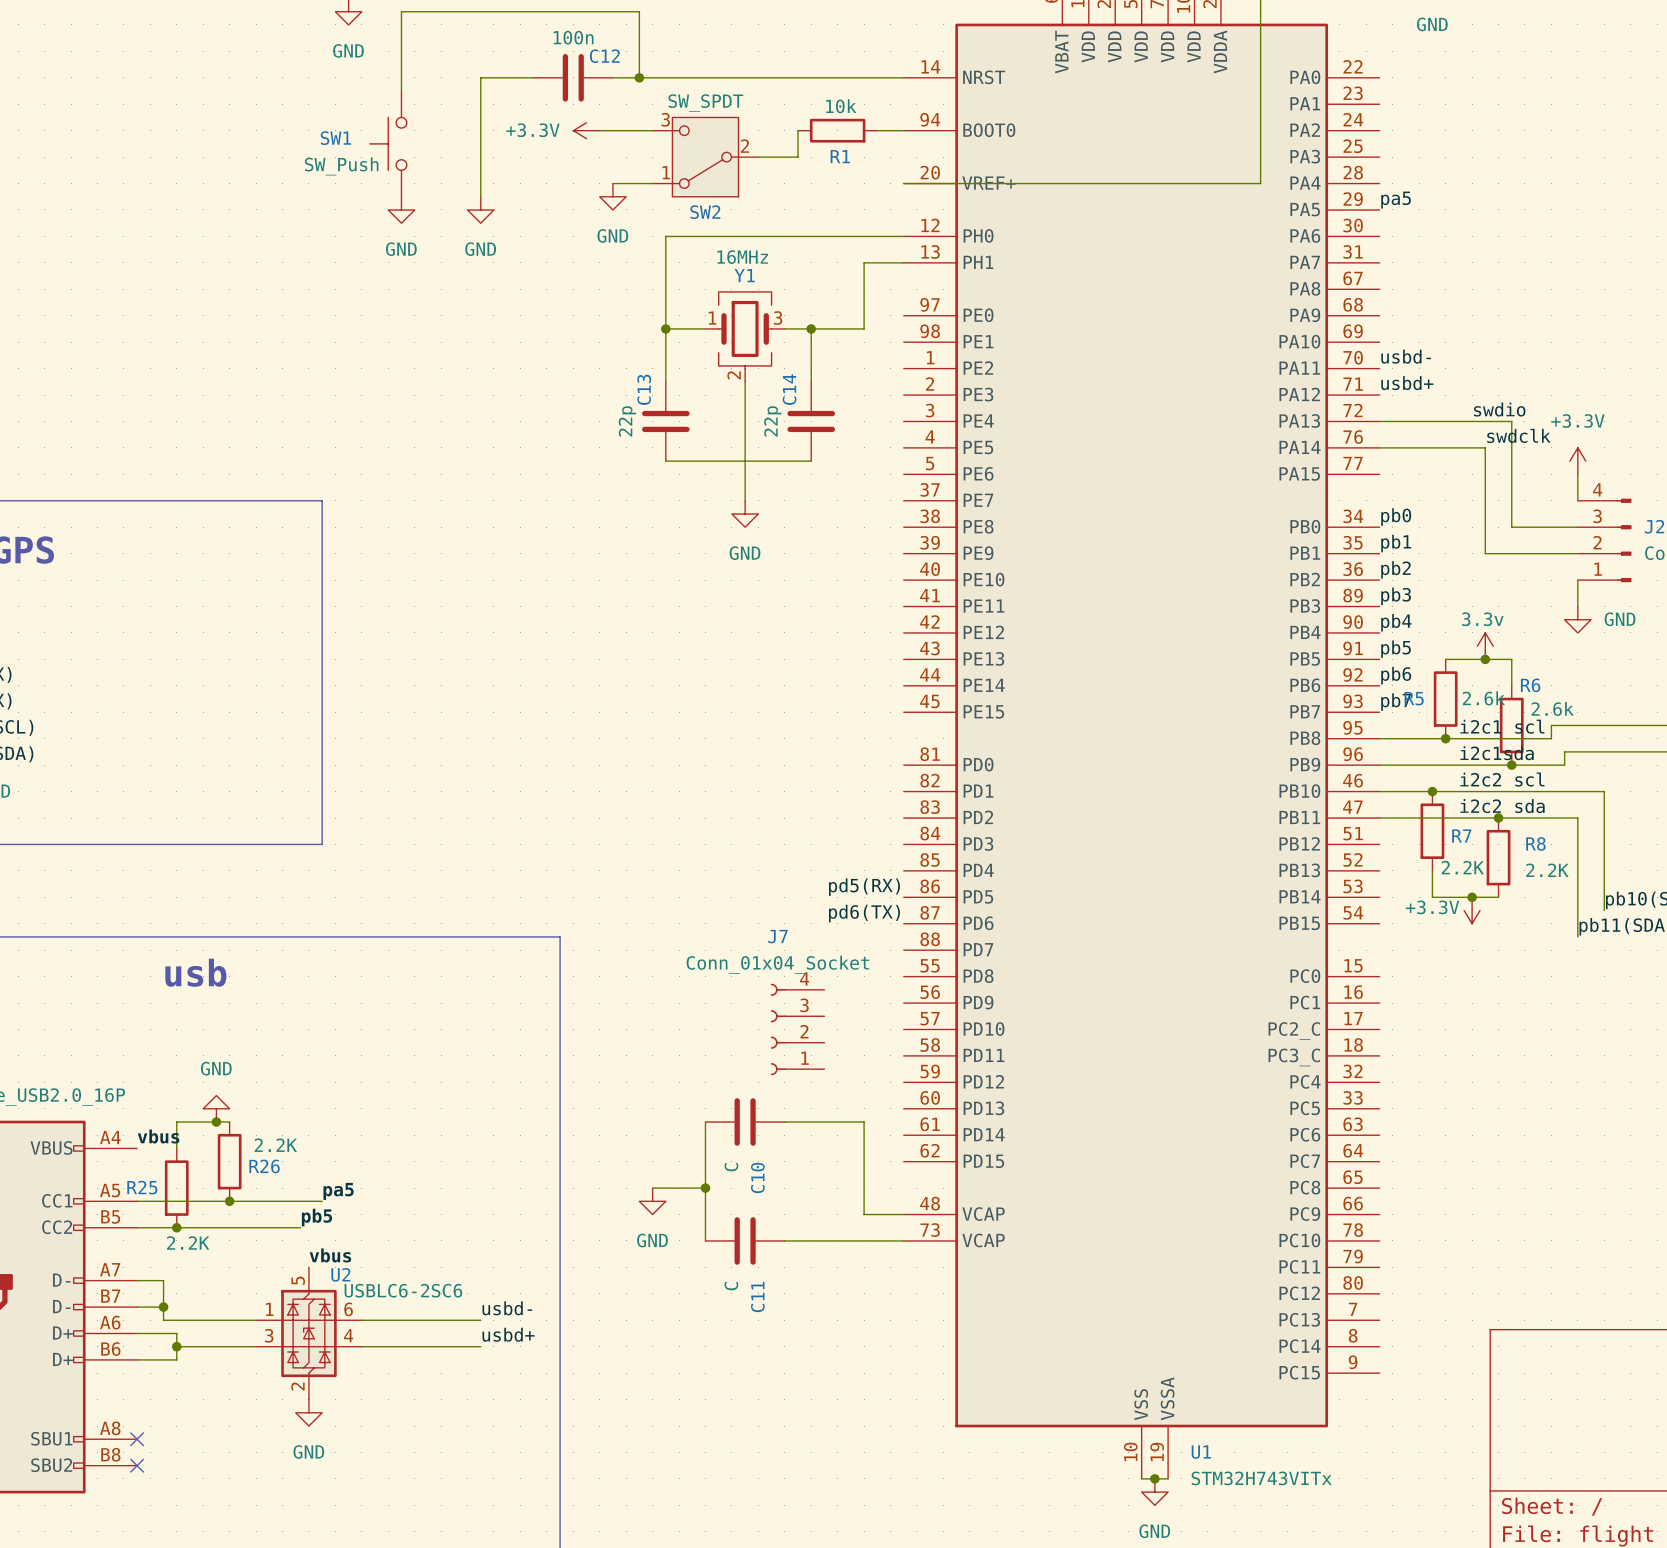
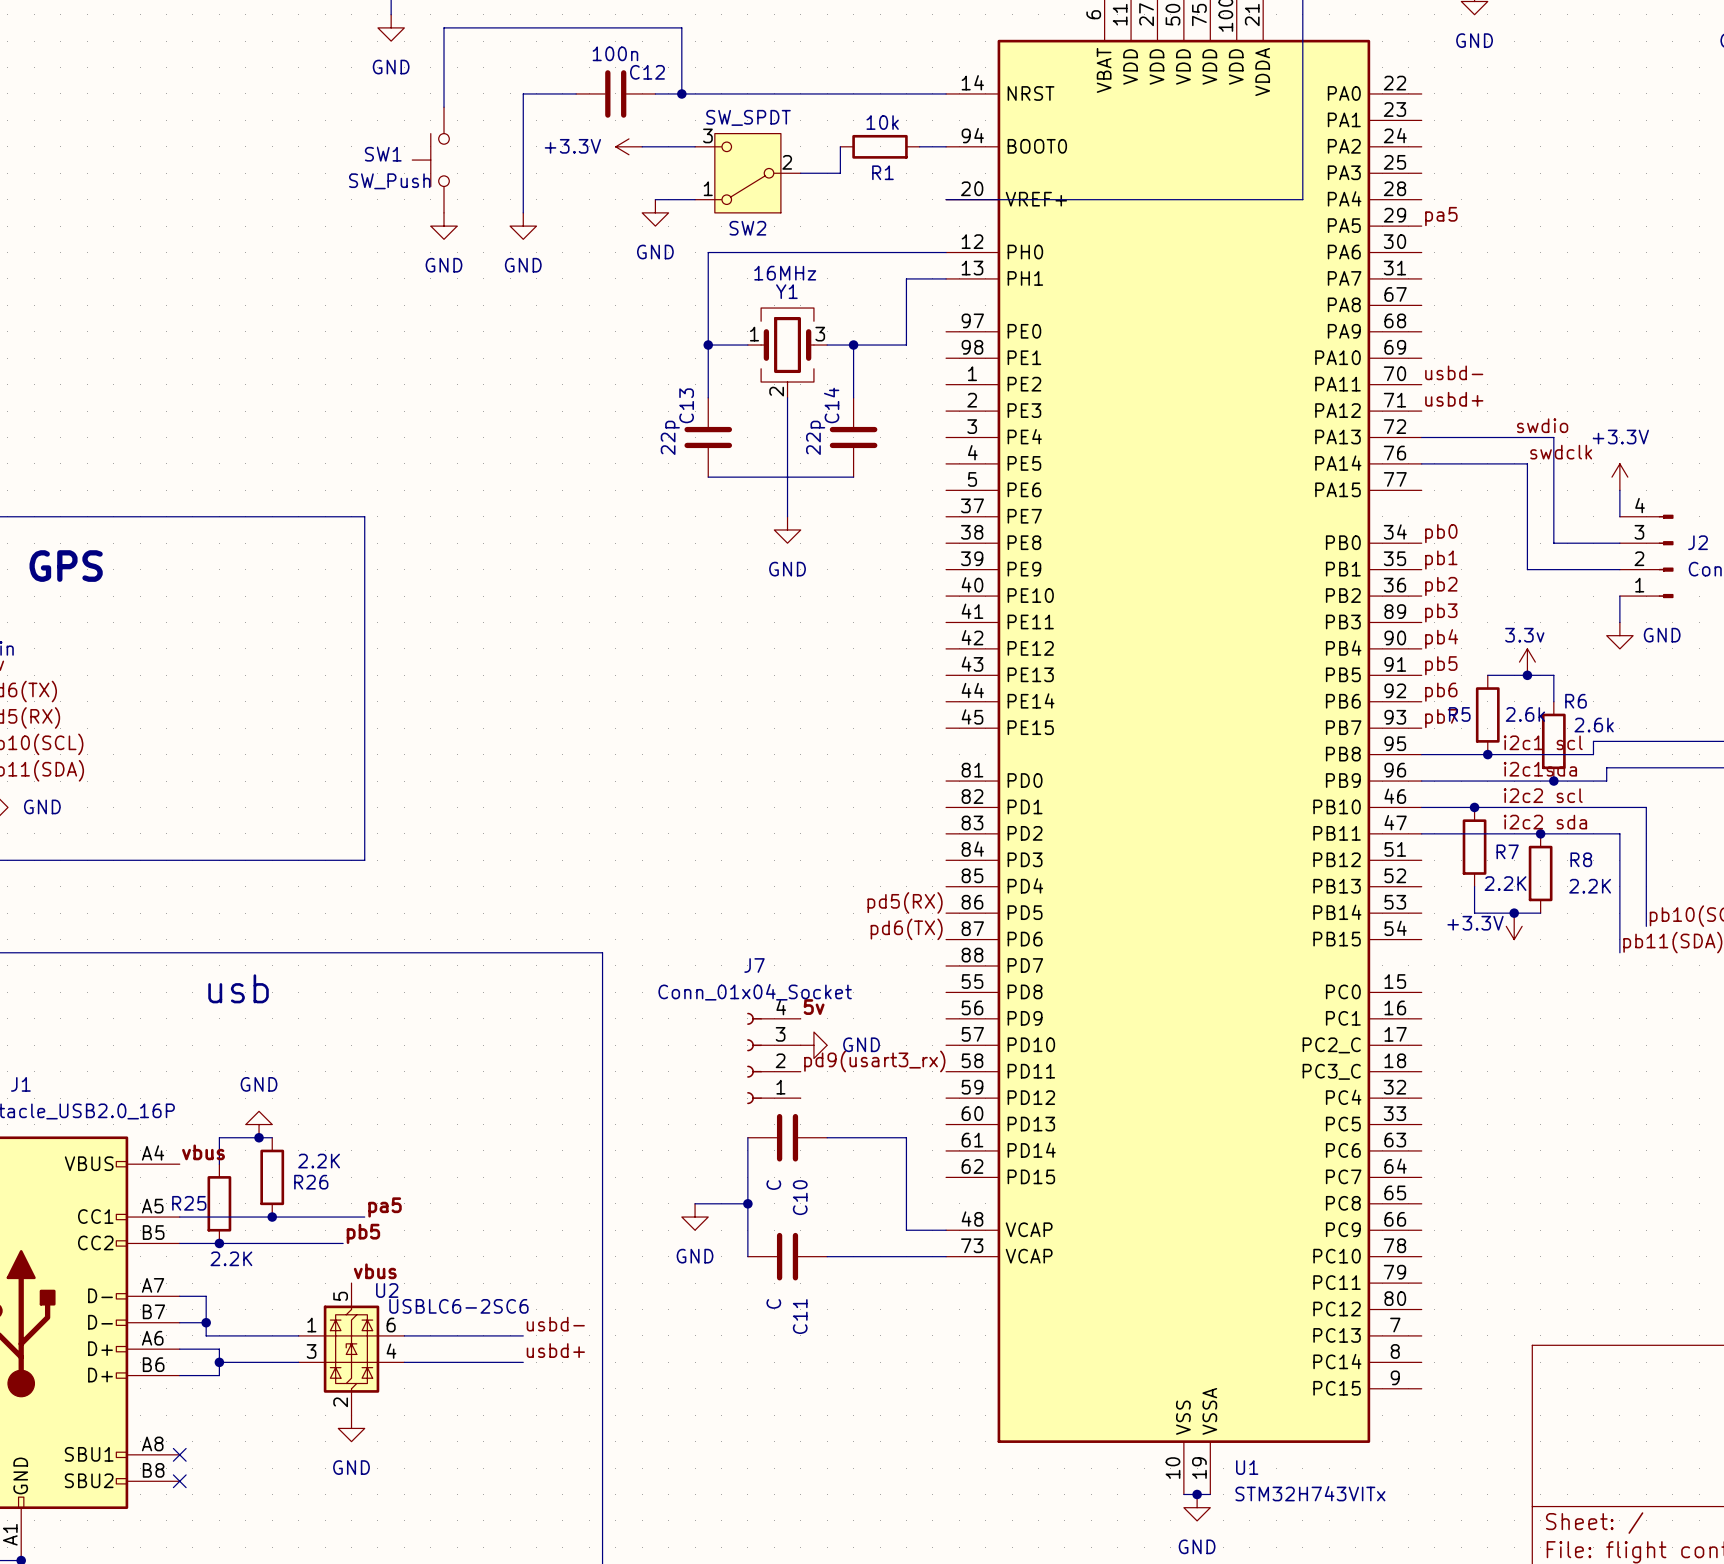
label: none -> 5v (814, 1007)
power symbol: none -> GND (813, 1045)
J7 position: (797, 1029) -> (773, 1058)
label: none -> pd9(usart3_rx) (874, 1061)

